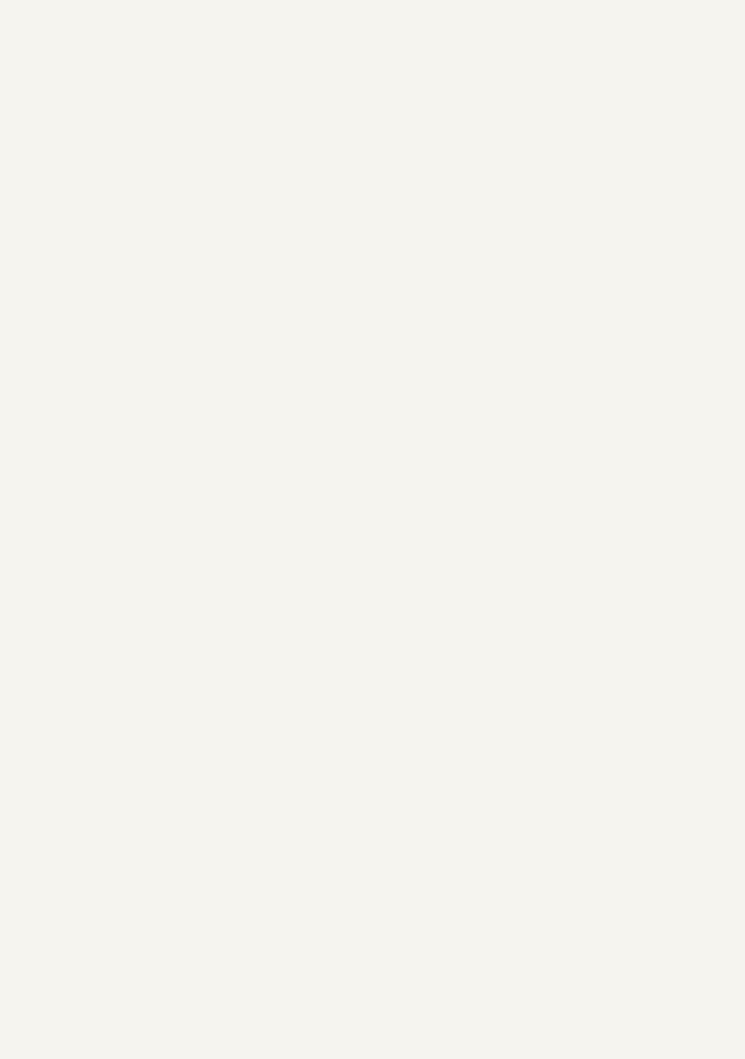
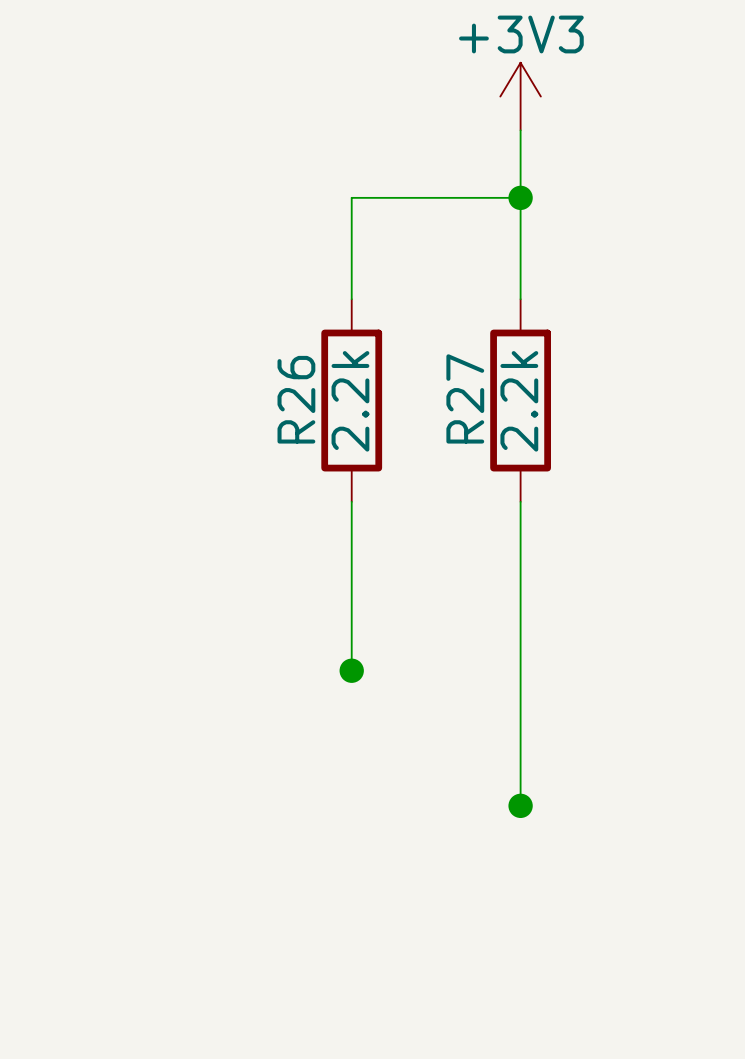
power symbol: none -> +3V3 (520, 96)
wire: none -> (520, 130) (520, 299)
wire: none -> (520, 197) (351, 197) (351, 299)
junction: none -> (520, 197)
R26: none -> 2.2k (351, 400)
R27: none -> 2.2k (520, 400)
wire: none -> (351, 501) (351, 670)
wire: none -> (520, 501) (520, 805)
junction: none -> (351, 670)
junction: none -> (520, 805)

